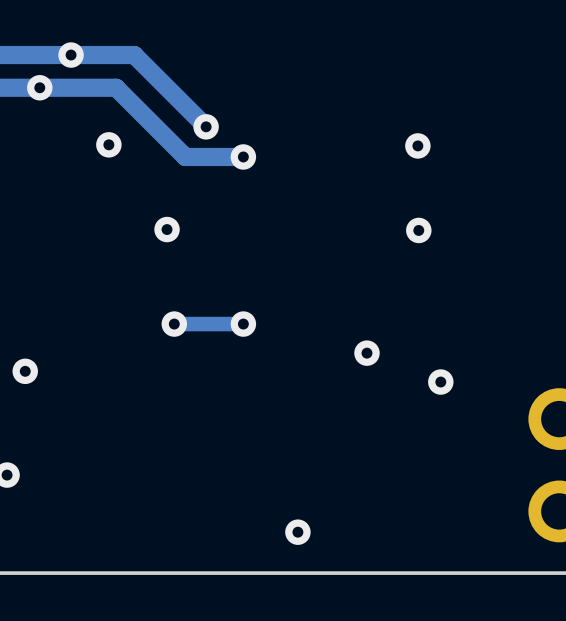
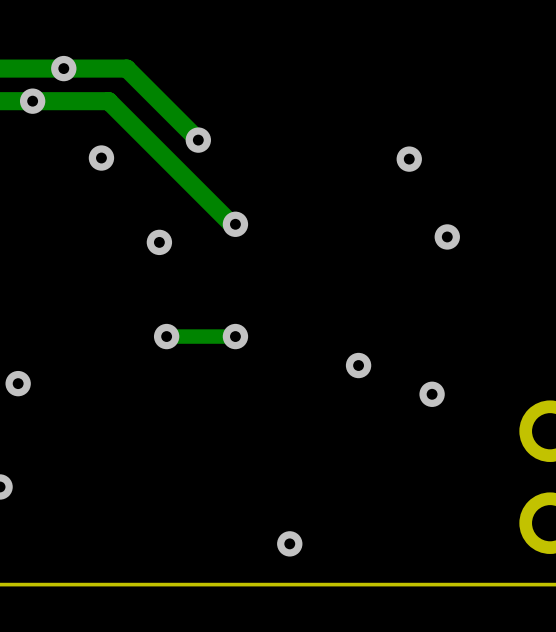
track: (243, 156) (185, 156) -> (235, 224) (231, 224) (177, 170)
via position: (243, 156) -> (235, 224)
via position: (418, 230) -> (447, 236)

